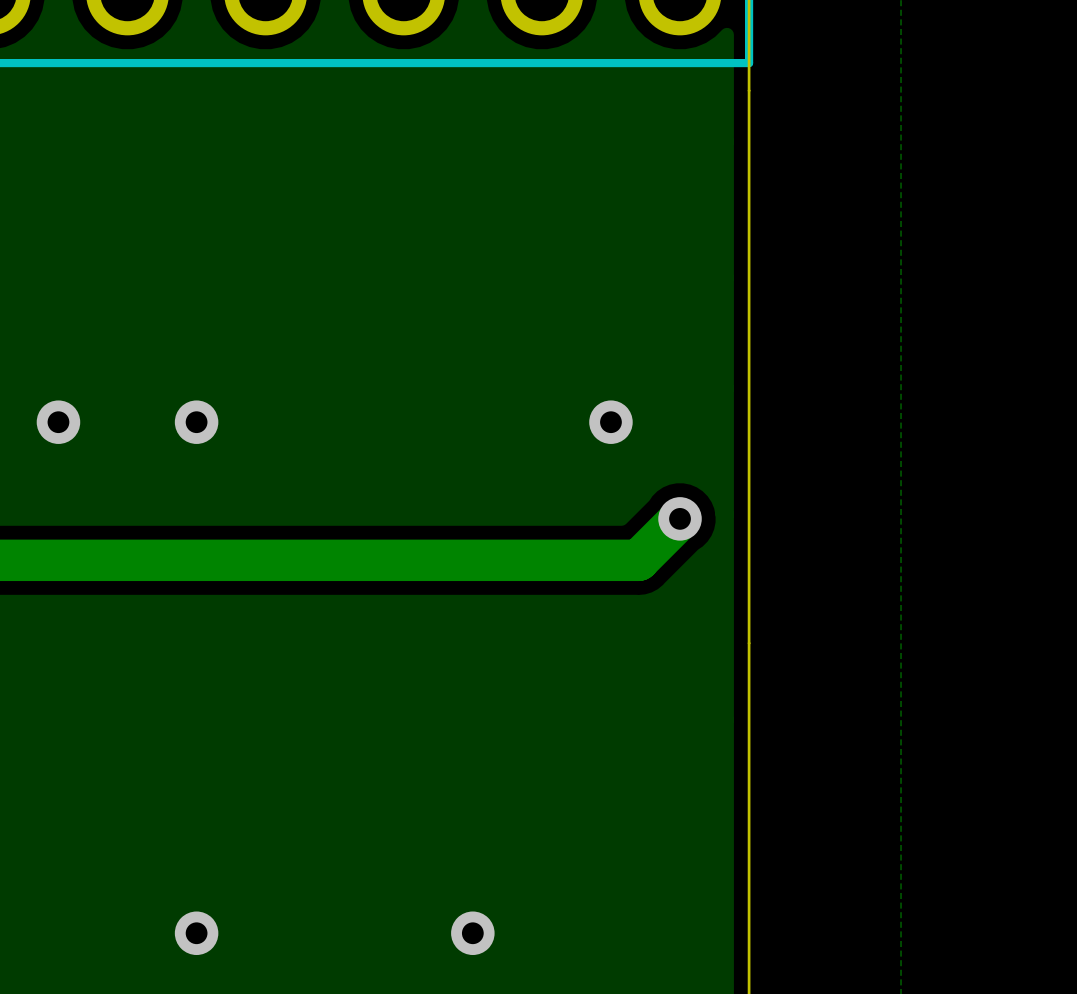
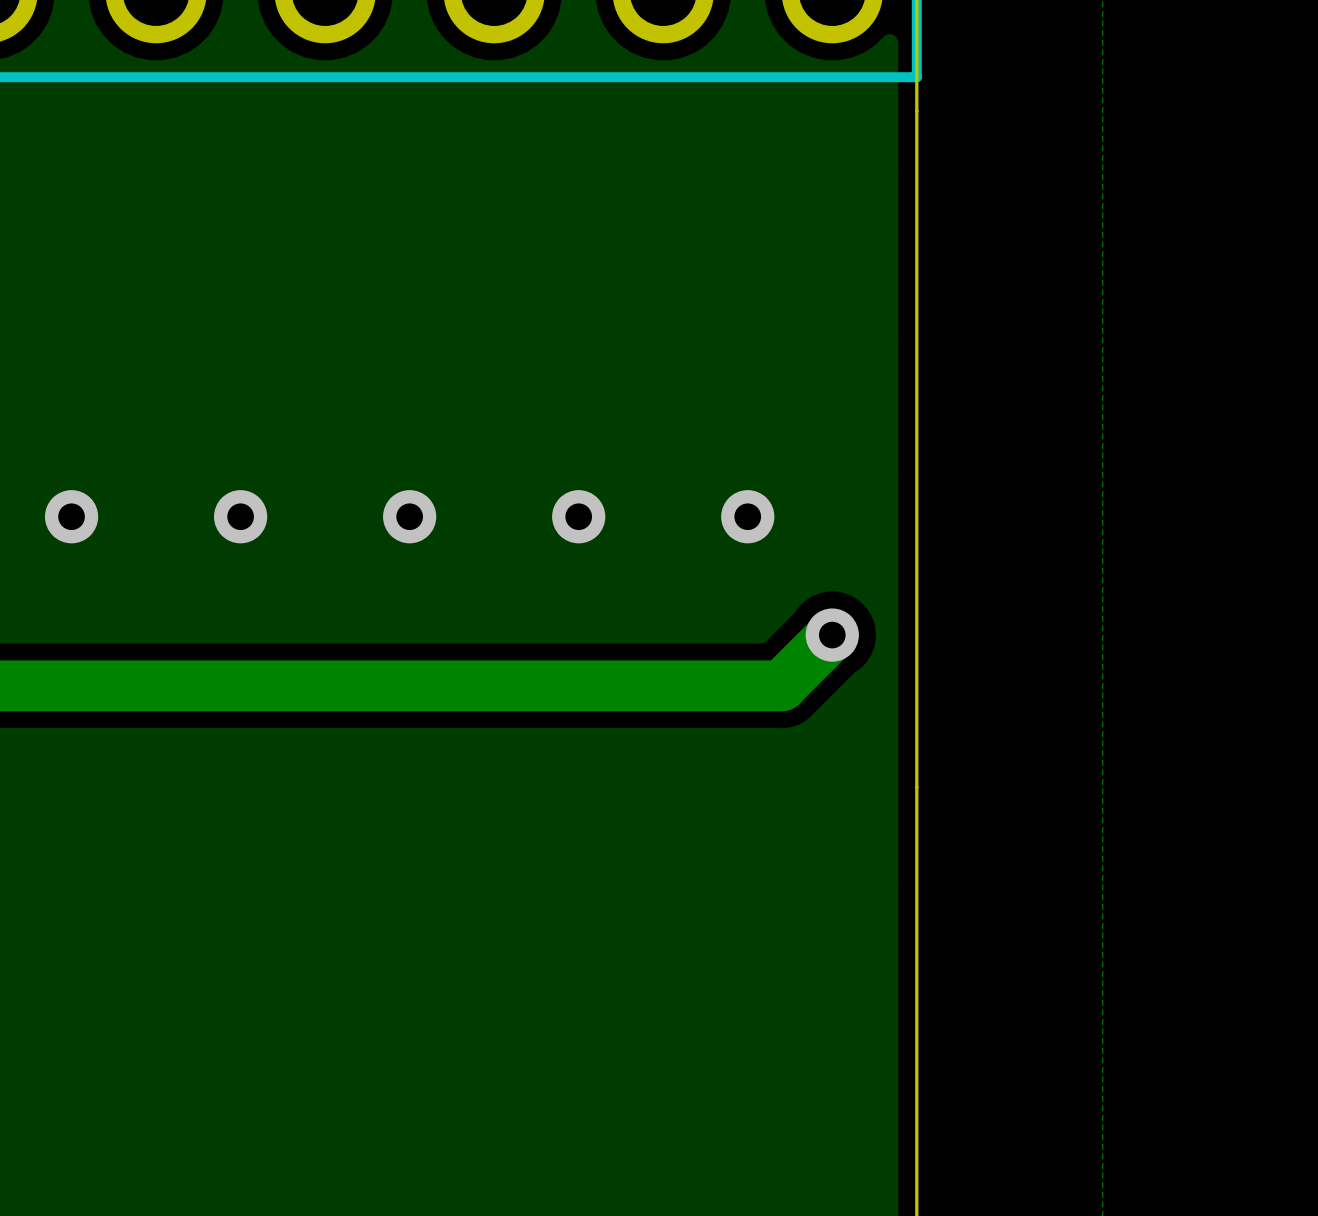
via: none -> (409, 516)
via: none -> (578, 516)
via: (196, 933) -> none
via: (472, 933) -> none

